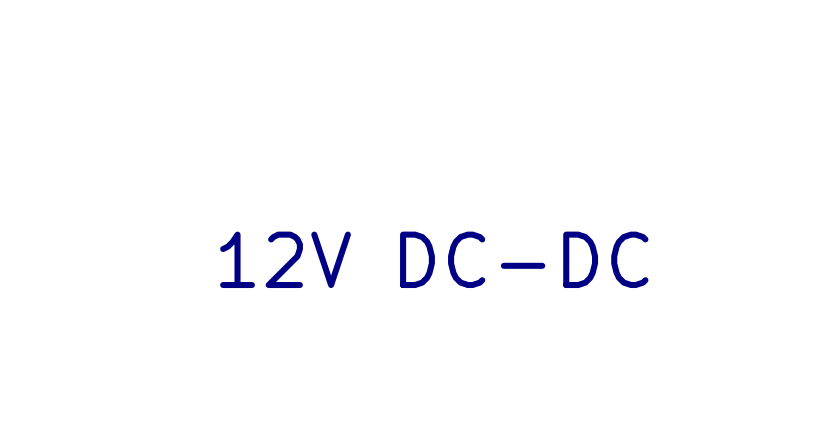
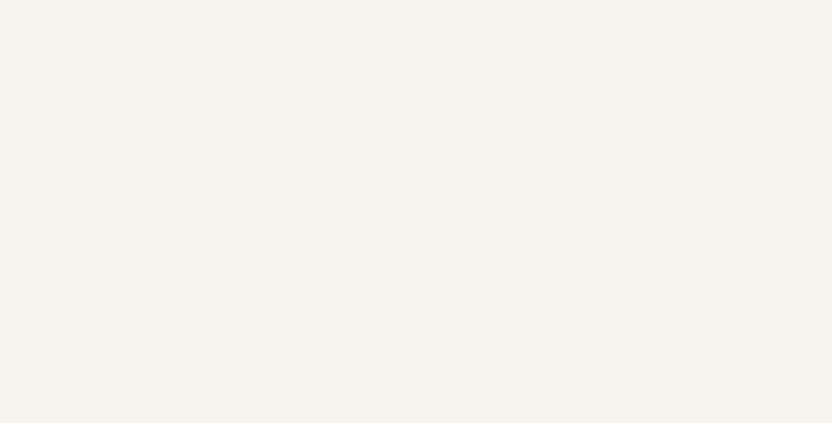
text: 12V DC-DC (434, 259) -> none

